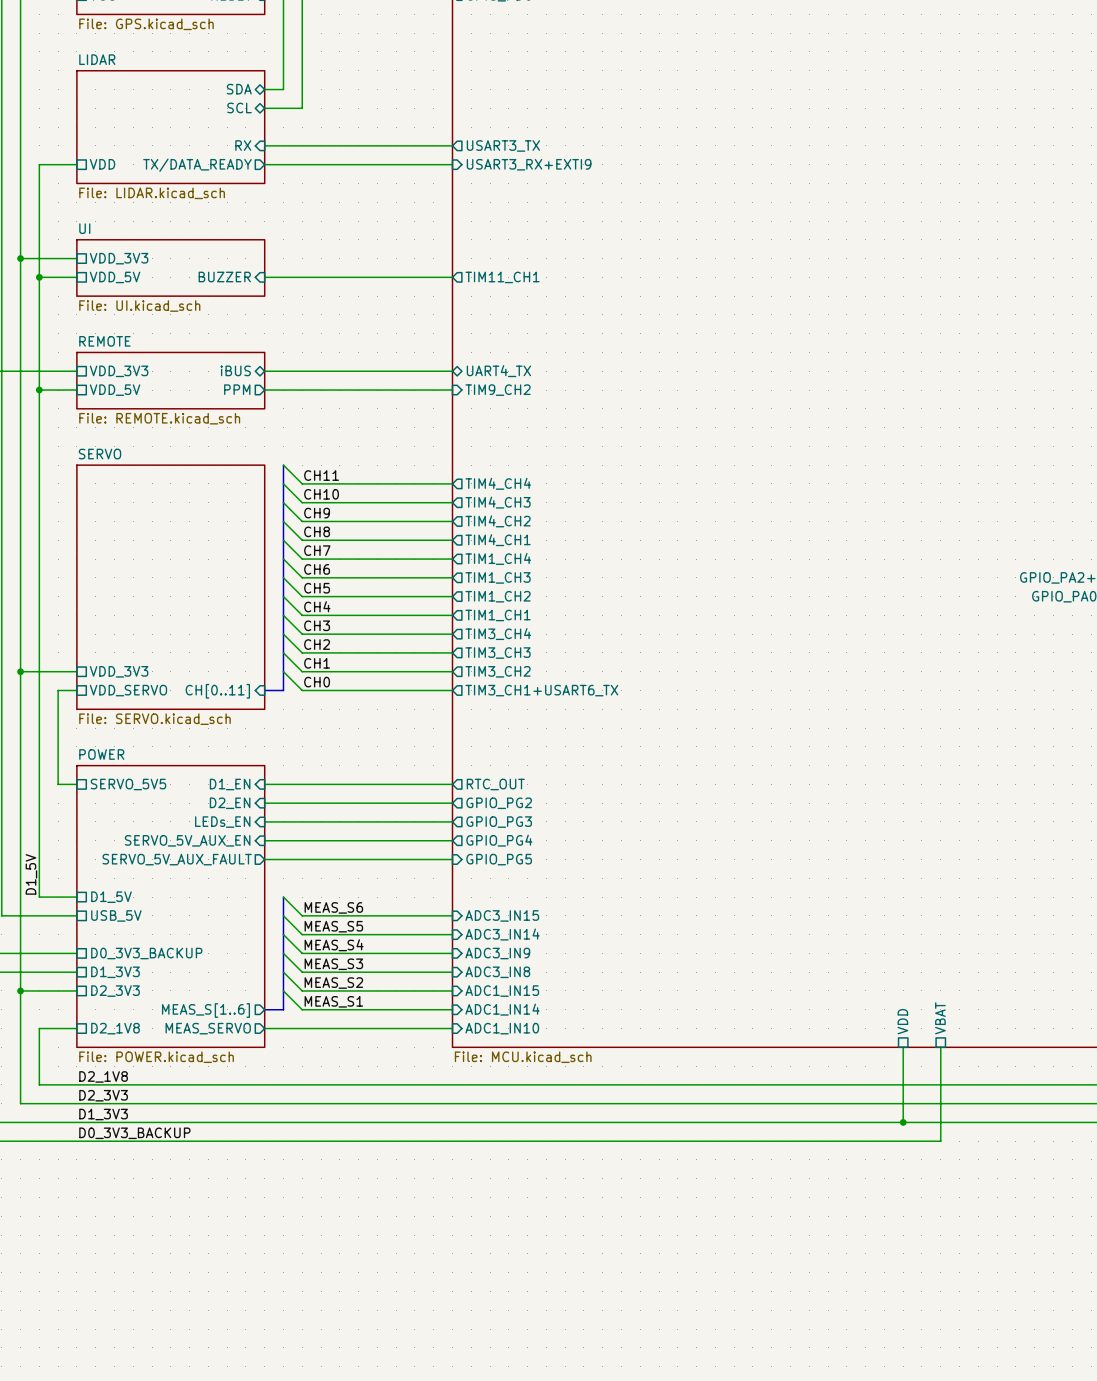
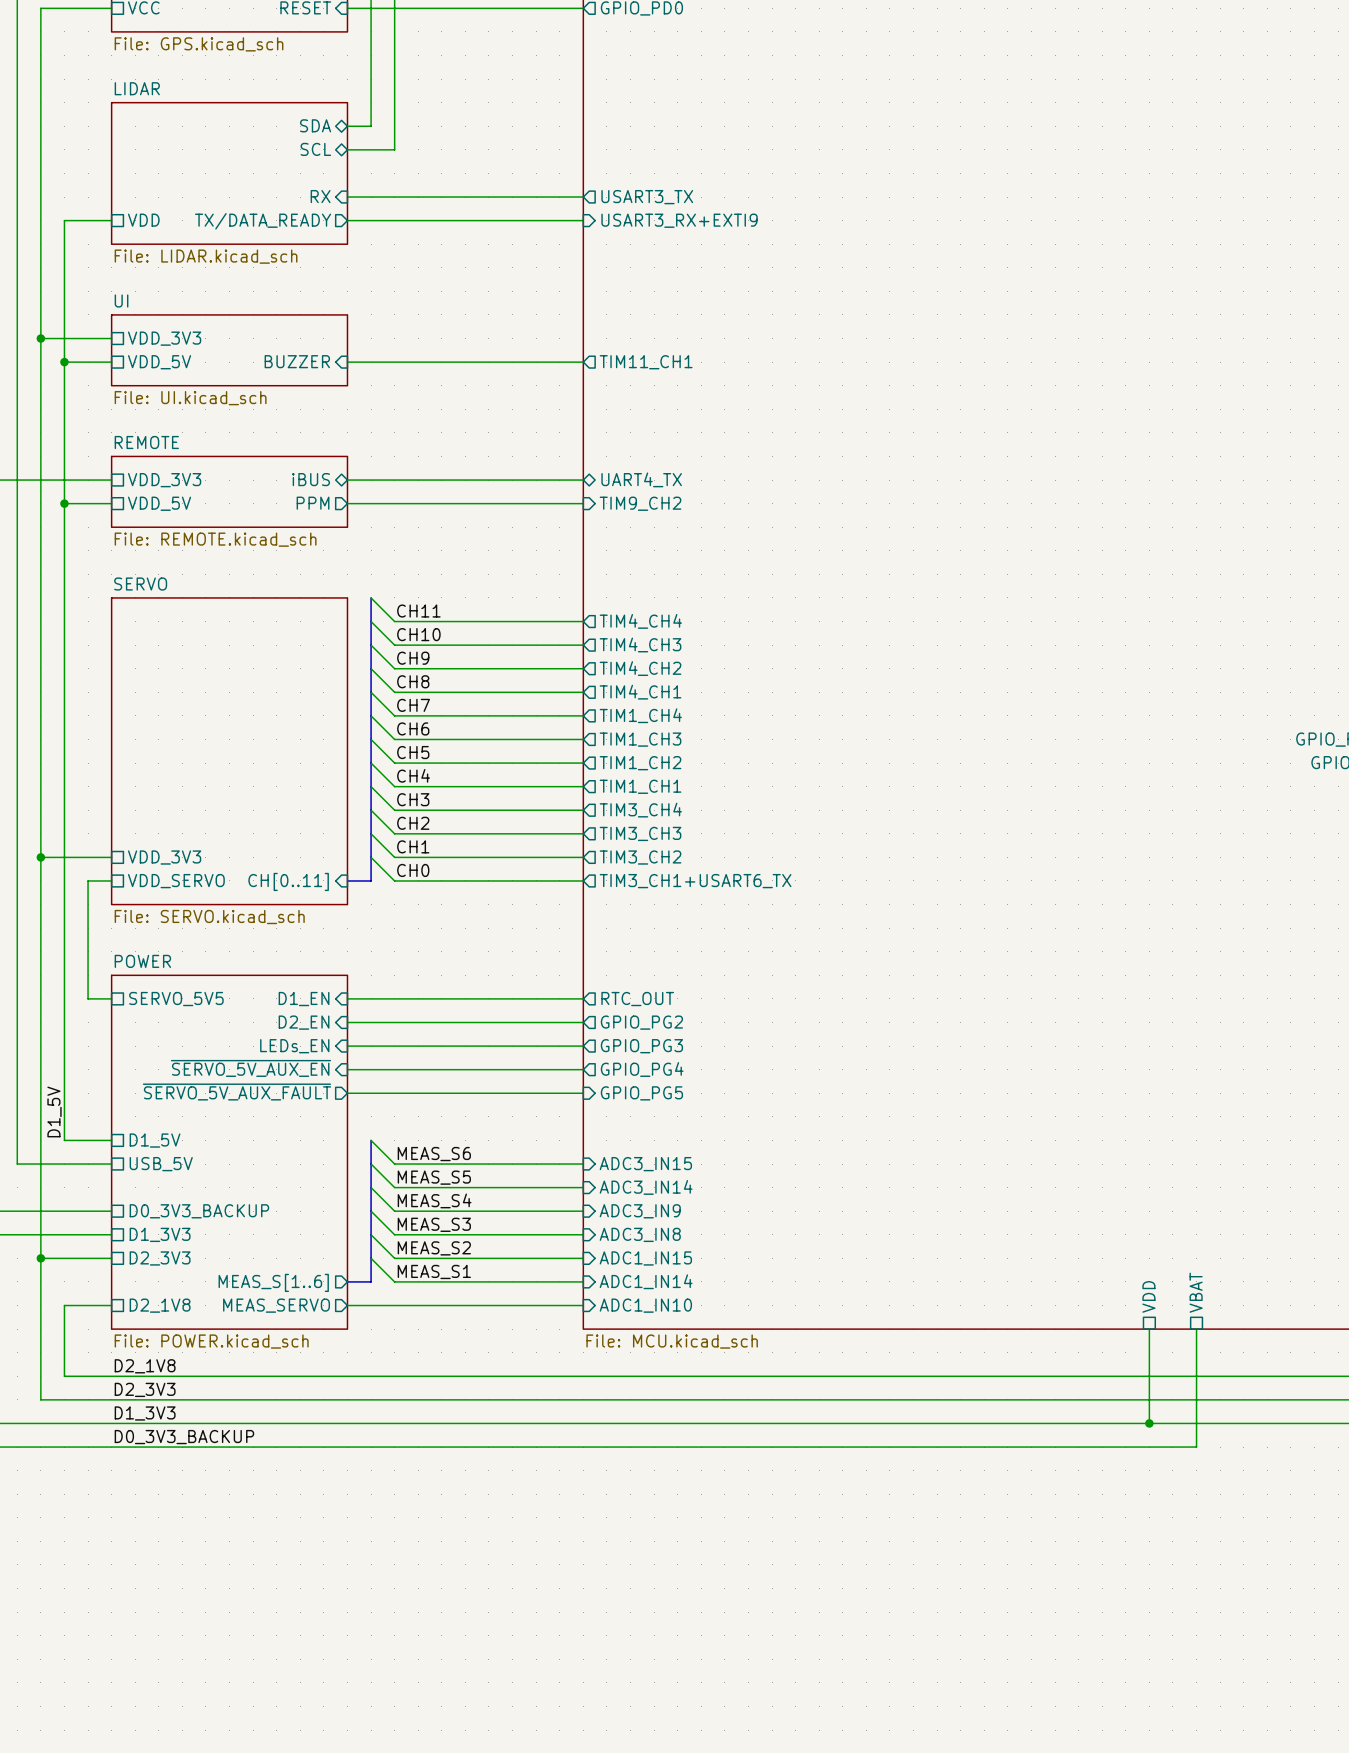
sheet pin: SERVO_5V_AUX_EN (187, 840) -> ~{SERVO_5V_AUX_EN} (250, 1068)
sheet pin: SERVO_5V_AUX_FAULT (177, 859) -> ~{SERVO_5V_AUX_FAULT} (236, 1092)

